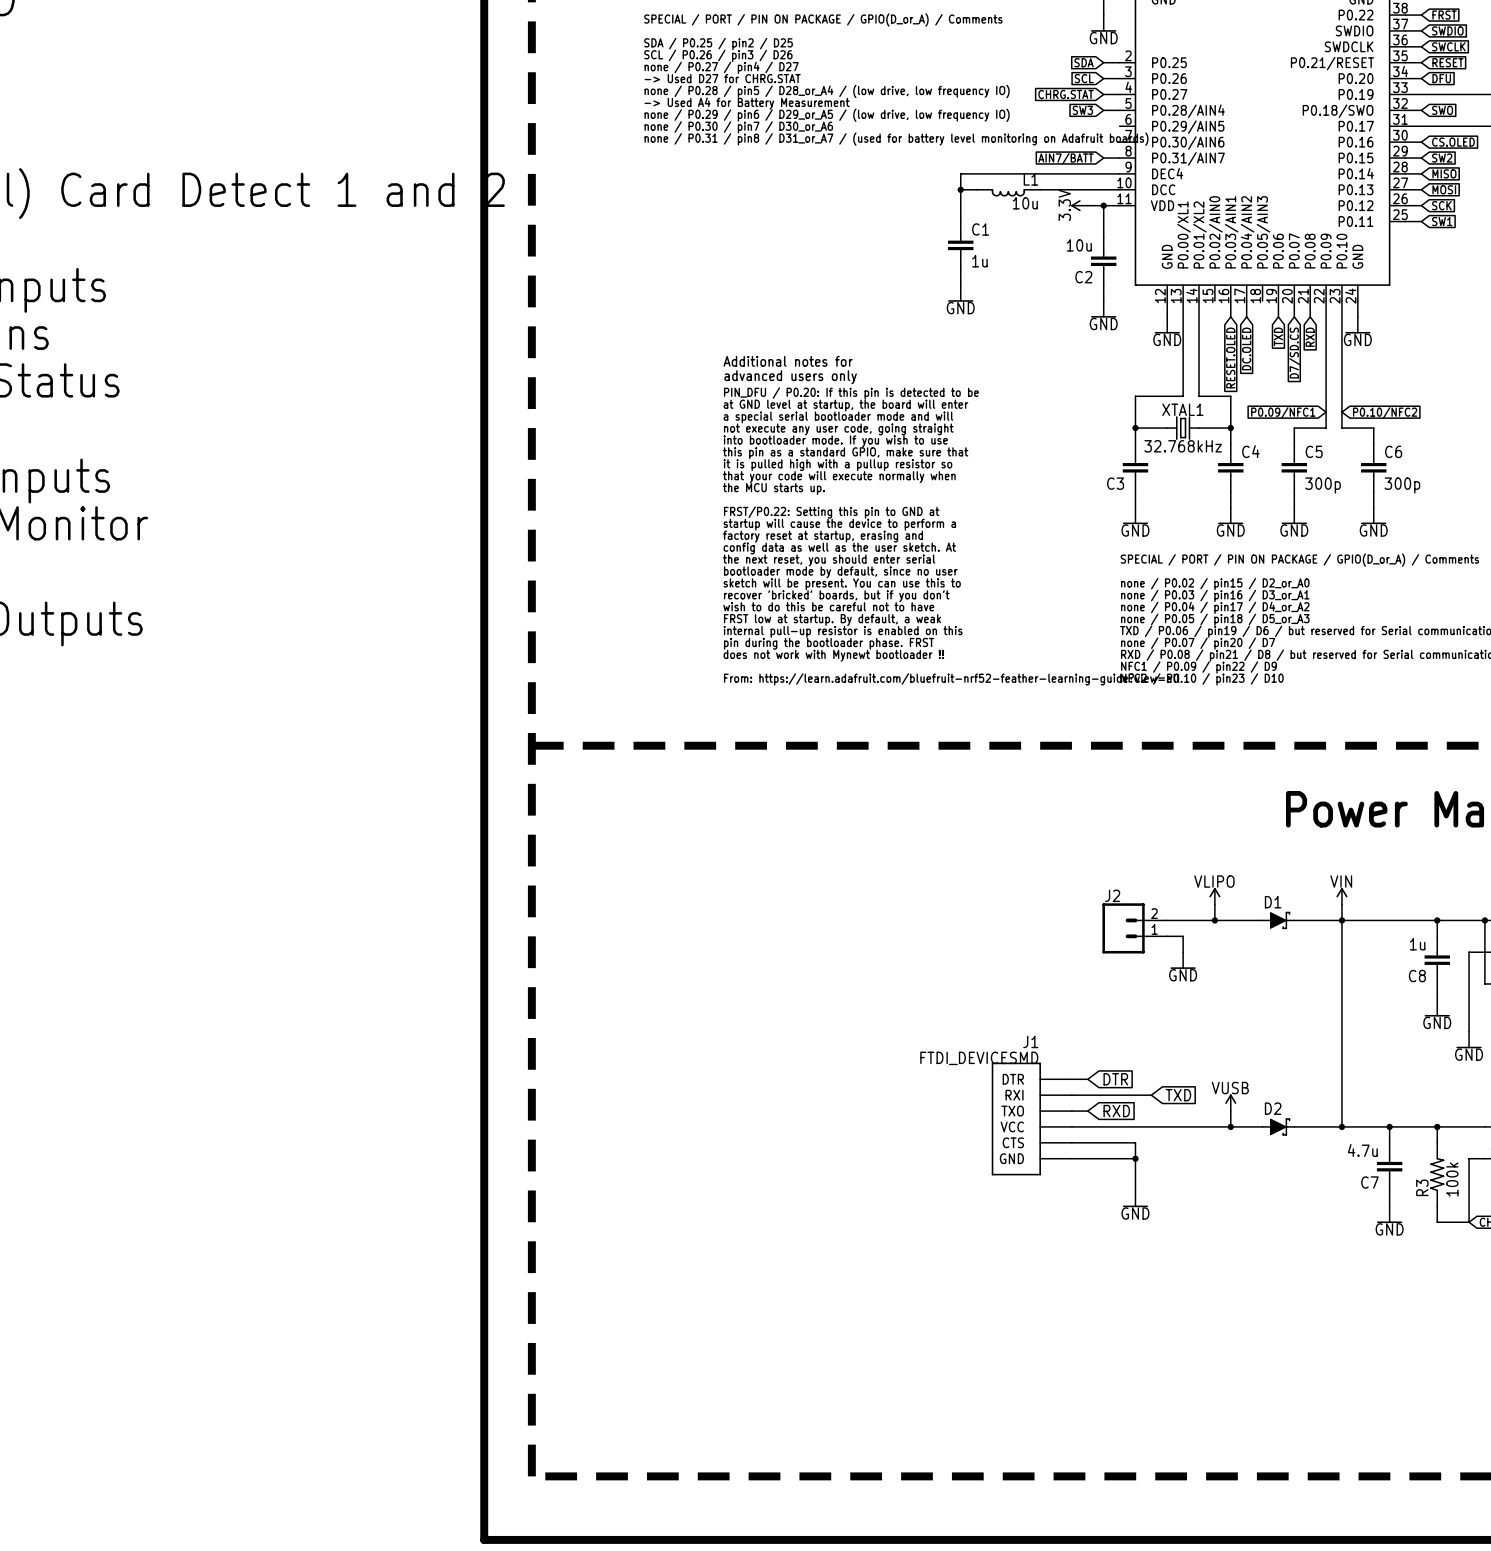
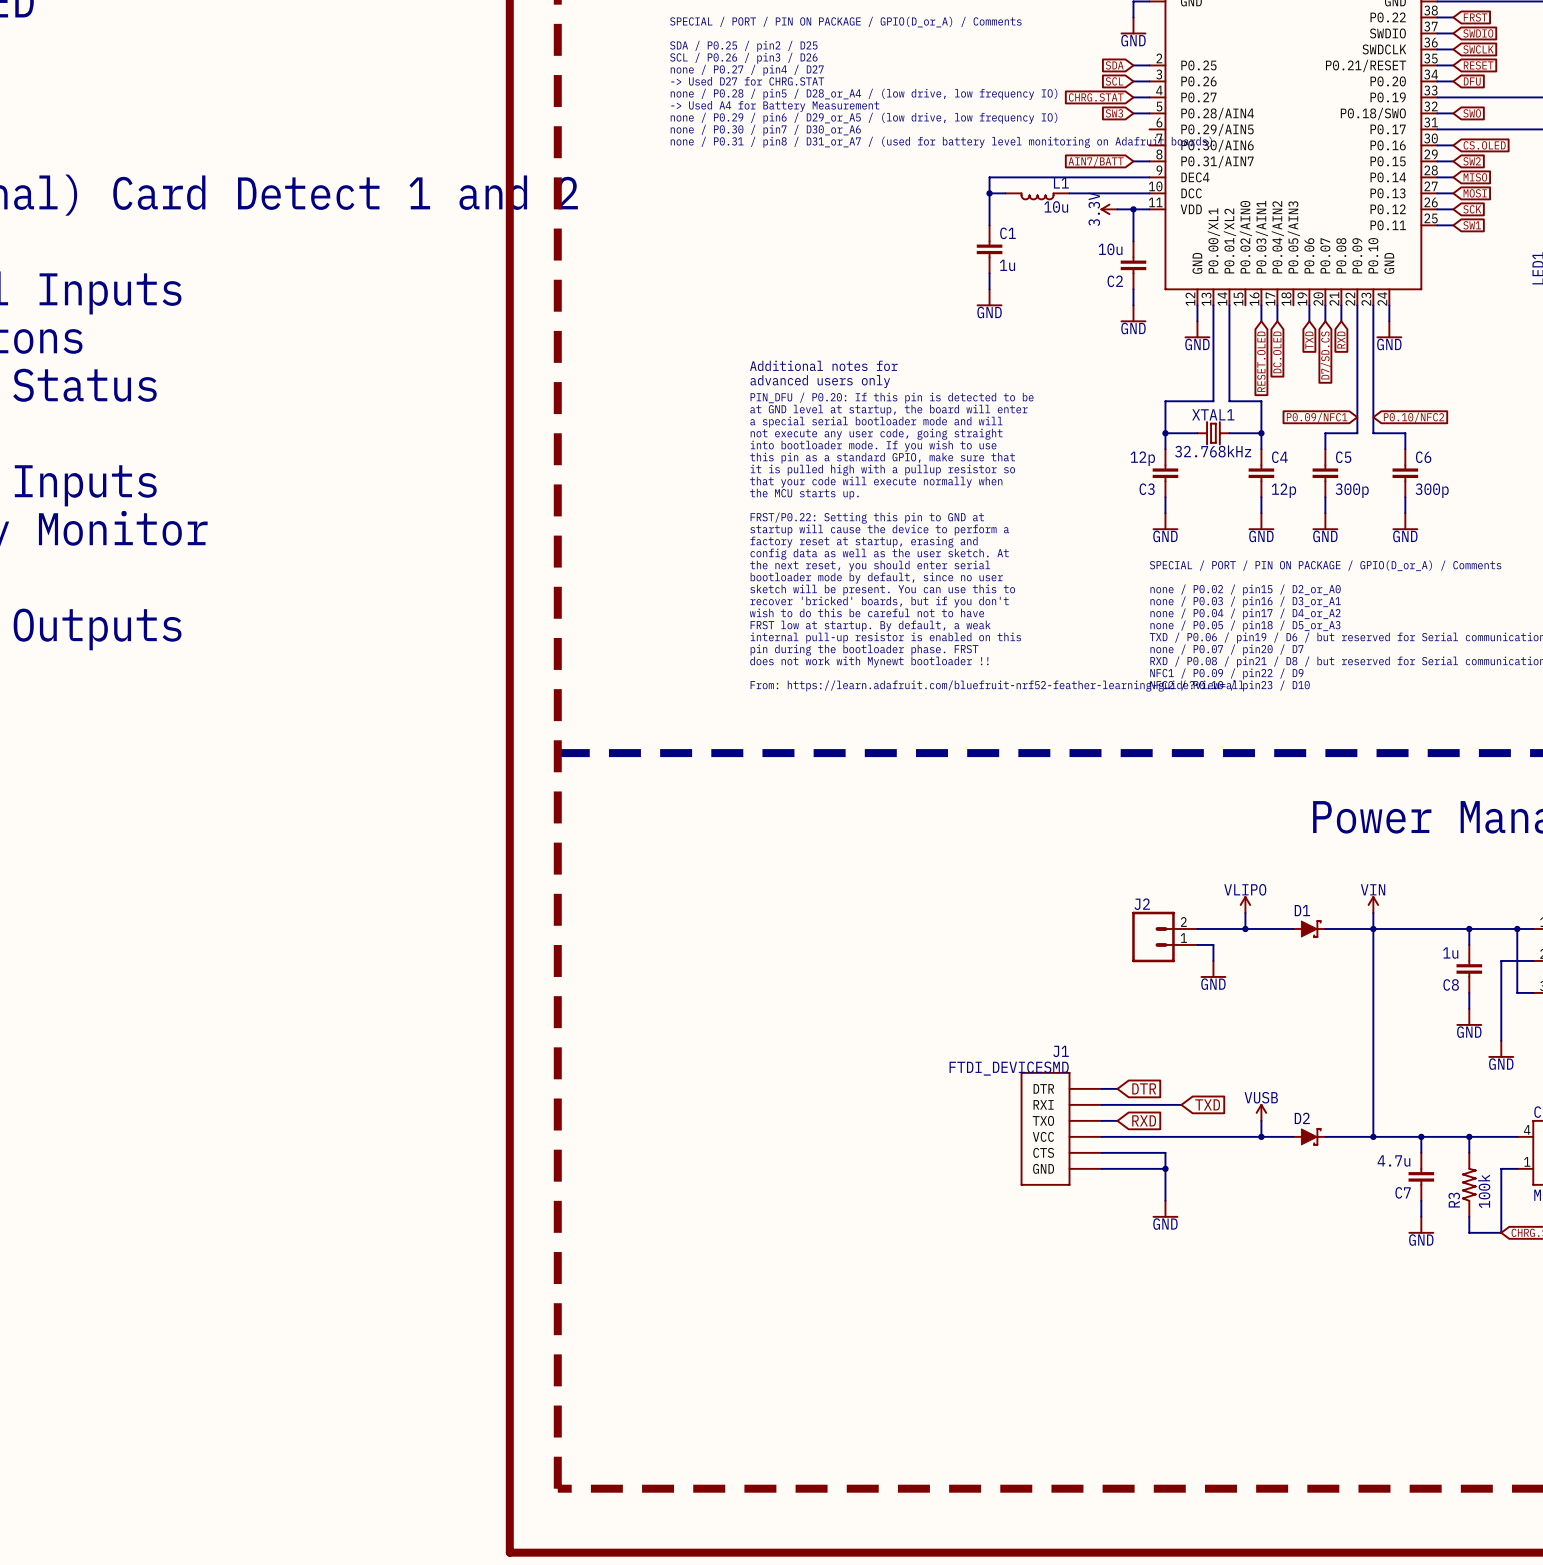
C3 value: none -> 12p (1142, 458)
C4 value: none -> 12p (1283, 490)

